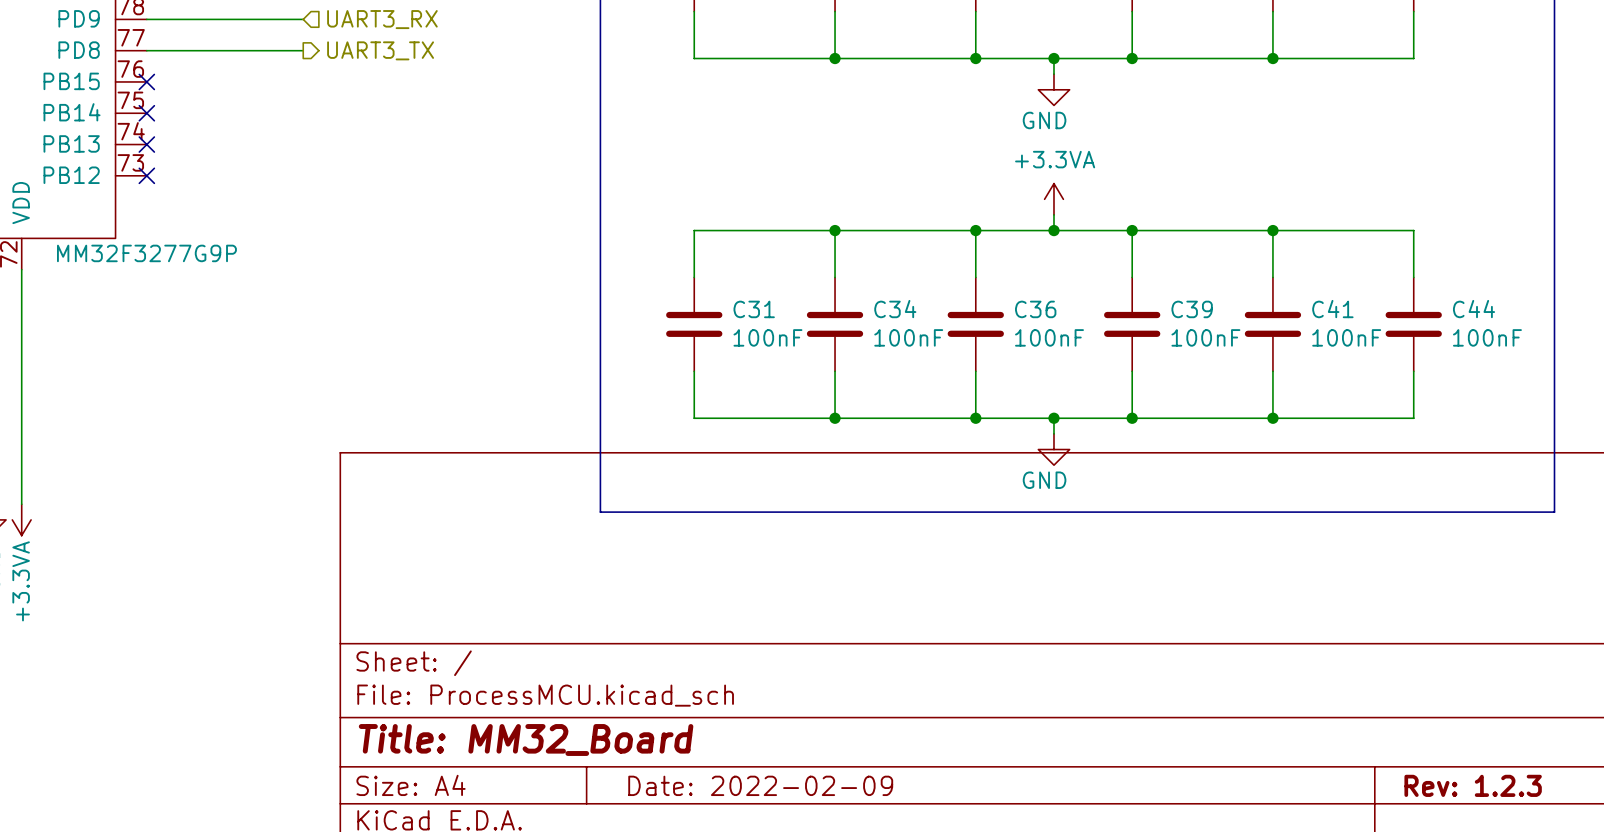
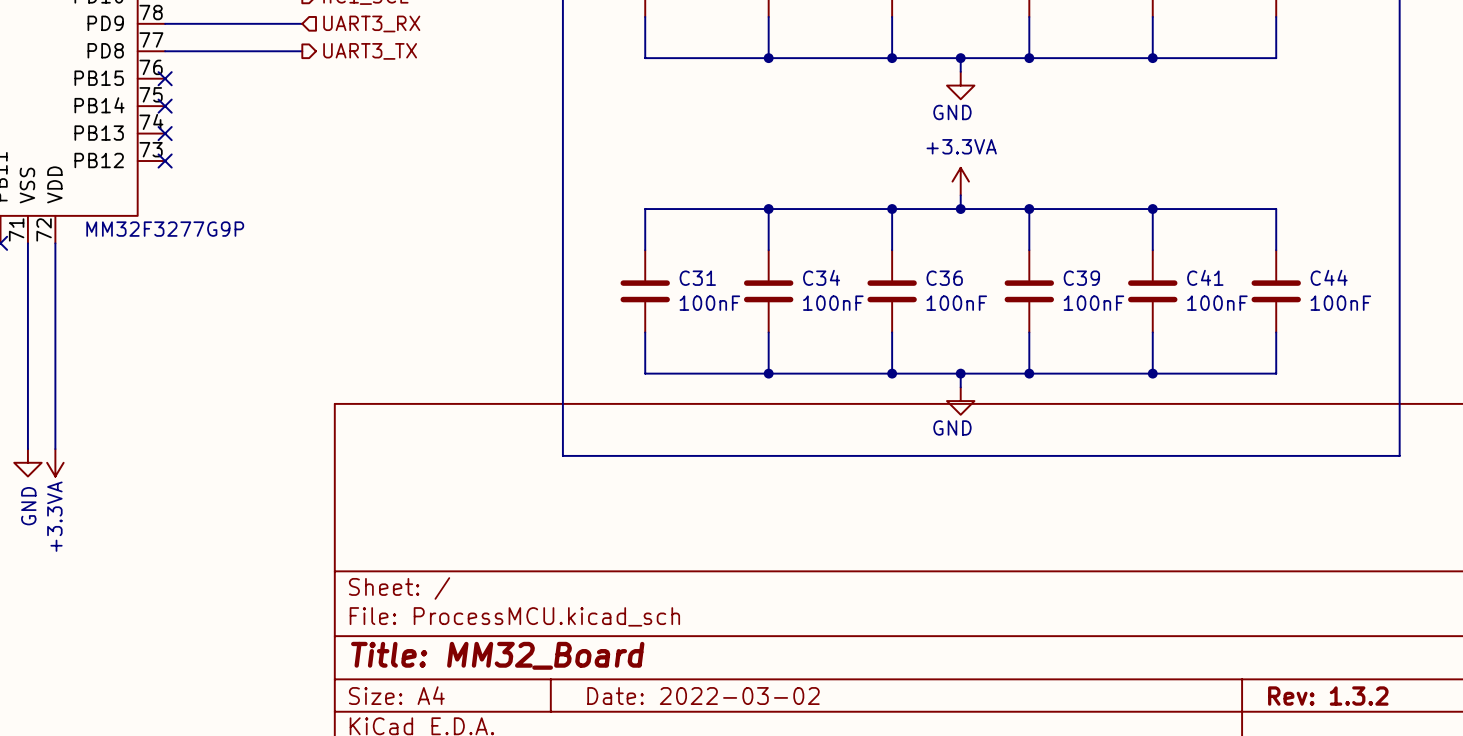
title block: Date: 2022-02-09 (760, 785) -> Date: 2022-03-02 (703, 696)
title block: Rev: 1.2.3 (1473, 785) -> Rev: 1.3.2 (1328, 696)

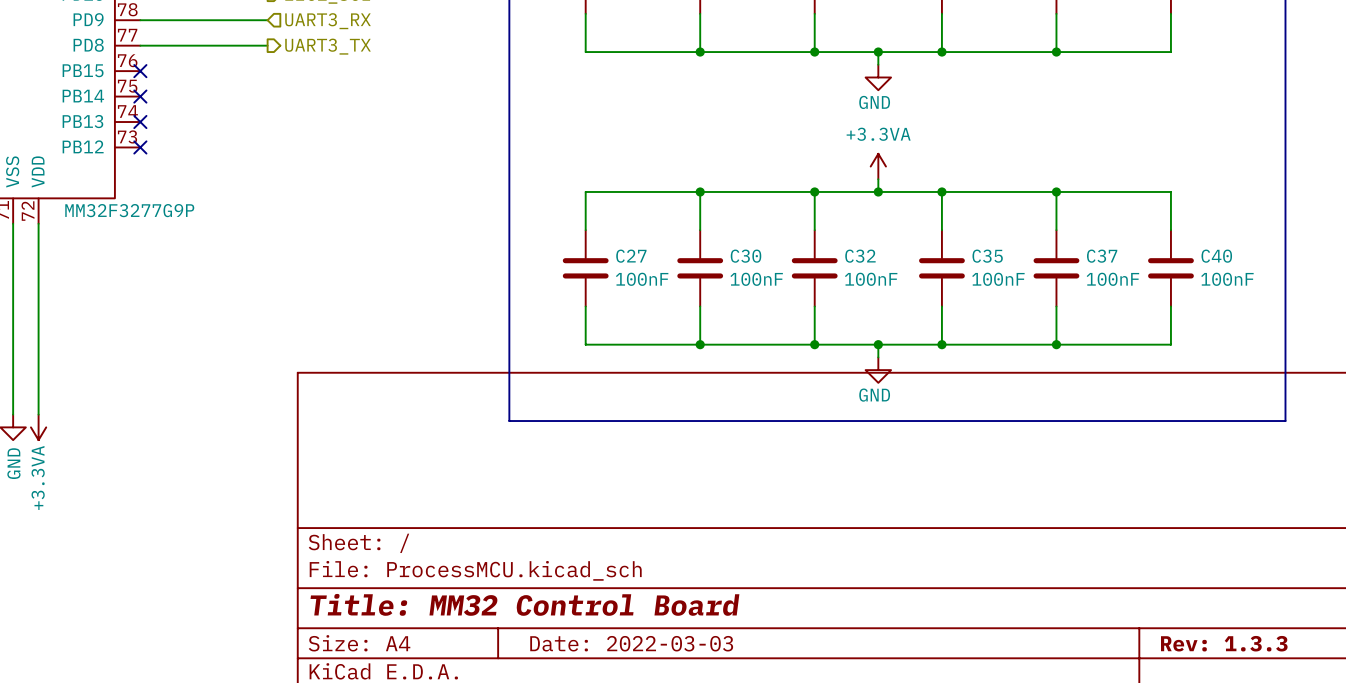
C34 name: C34 (821, 277) -> C30 (746, 256)
C41 name: C41 (1205, 277) -> C37 (1102, 256)
C44 name: C44 (1329, 277) -> C40 (1216, 256)
C31 name: C31 (697, 278) -> C27 (631, 256)
C36 name: C36 (944, 278) -> C32 (860, 256)
C39 name: C39 (1081, 278) -> C35 (987, 256)
title block: Title: MM32_Board (497, 655) -> Title: MM32 Control Board (524, 604)
title block: Date: 2022-03-02 (703, 696) -> Date: 2022-03-03 (631, 643)
title block: Rev: 1.3.2 (1328, 696) -> Rev: 1.3.3 (1224, 643)

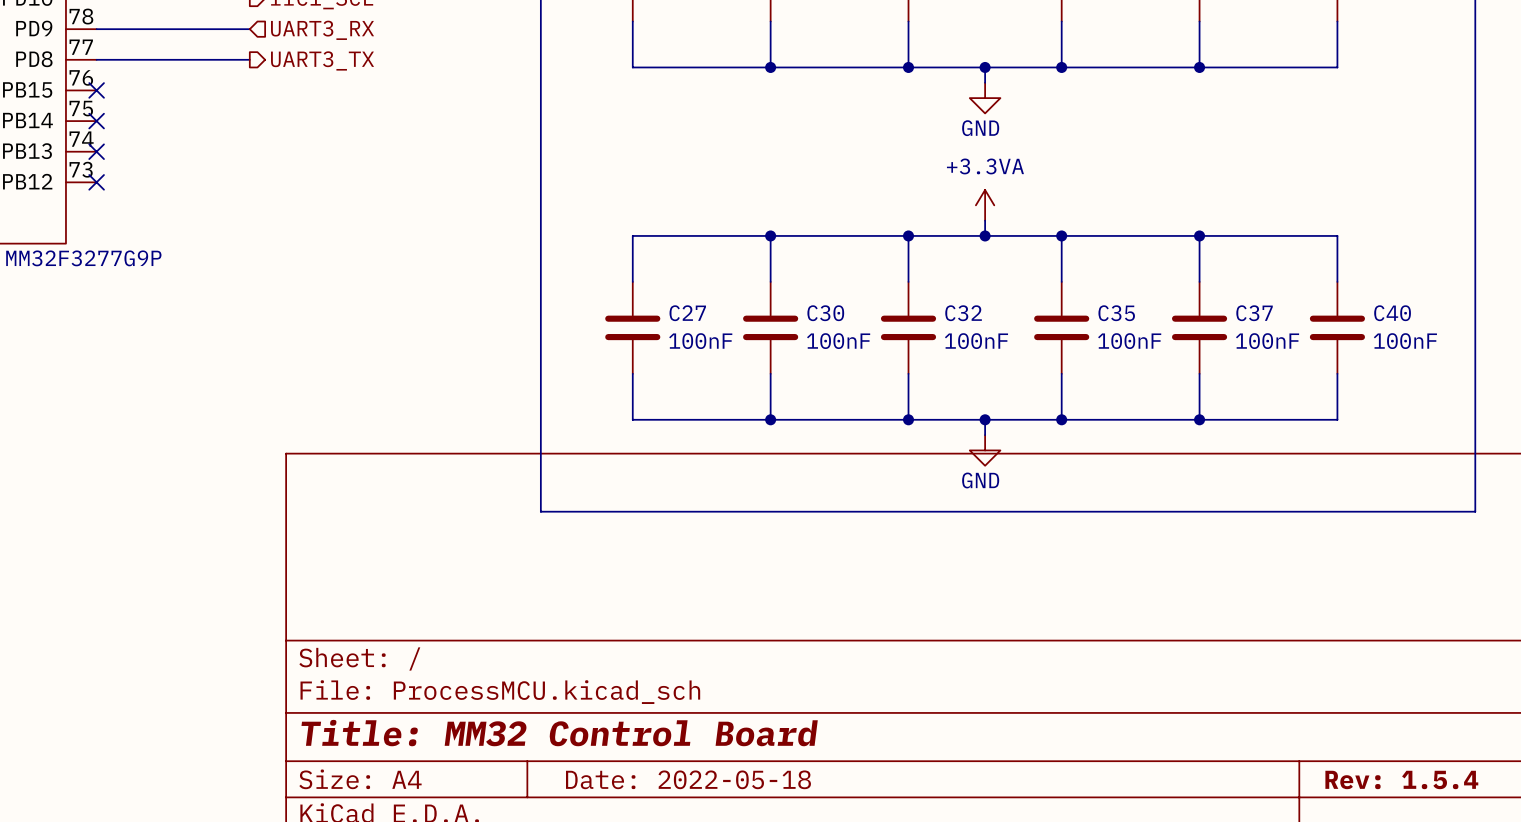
title block: Date: 2022-03-03 (631, 643) -> Date: 2022-05-18 (688, 779)
title block: Rev: 1.3.3 (1224, 643) -> Rev: 1.5.4 (1401, 779)

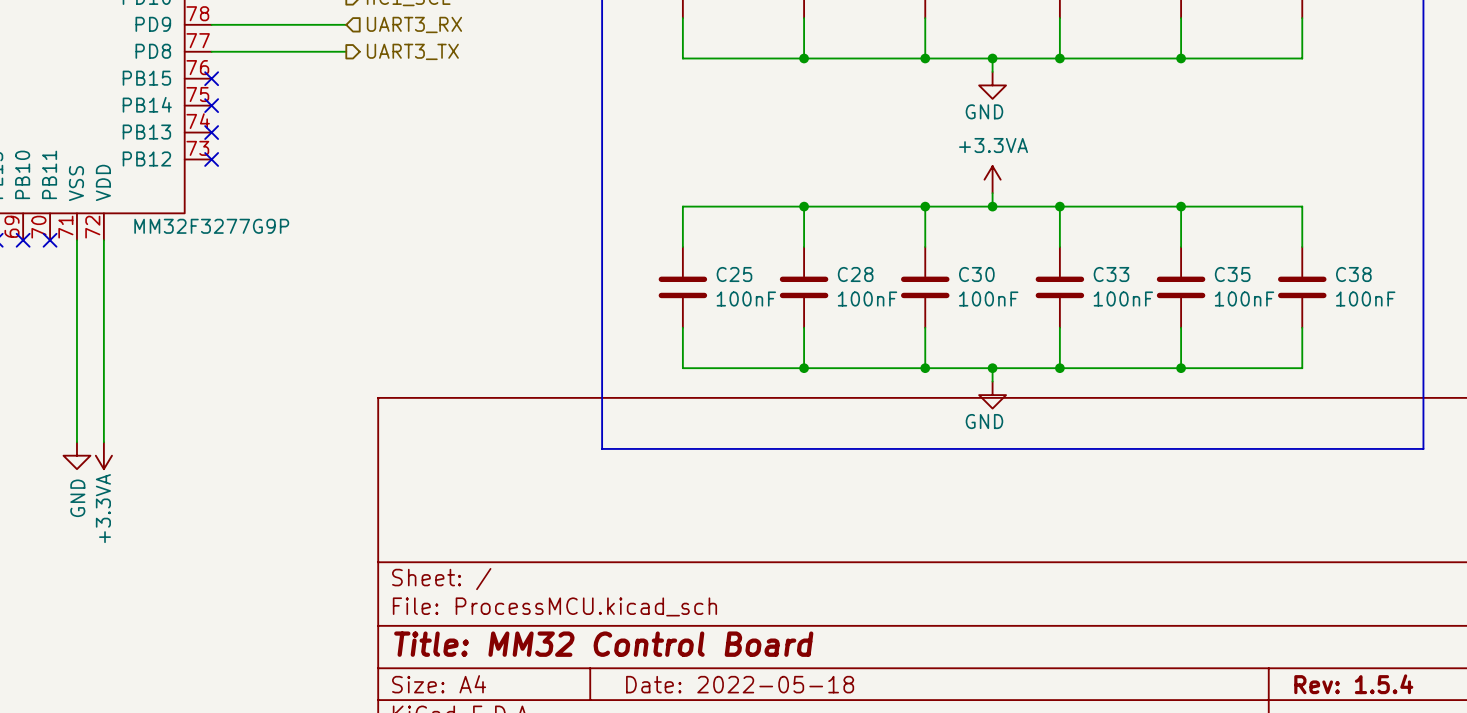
C27 name: C27 (687, 313) -> C25 (734, 274)
C30 name: C30 (825, 313) -> C28 (855, 274)
C32 name: C32 (963, 313) -> C30 (976, 274)
C35 name: C35 (1116, 313) -> C33 (1111, 274)
C37 name: C37 (1254, 313) -> C35 (1232, 274)
C40 name: C40 (1392, 313) -> C38 (1353, 274)

